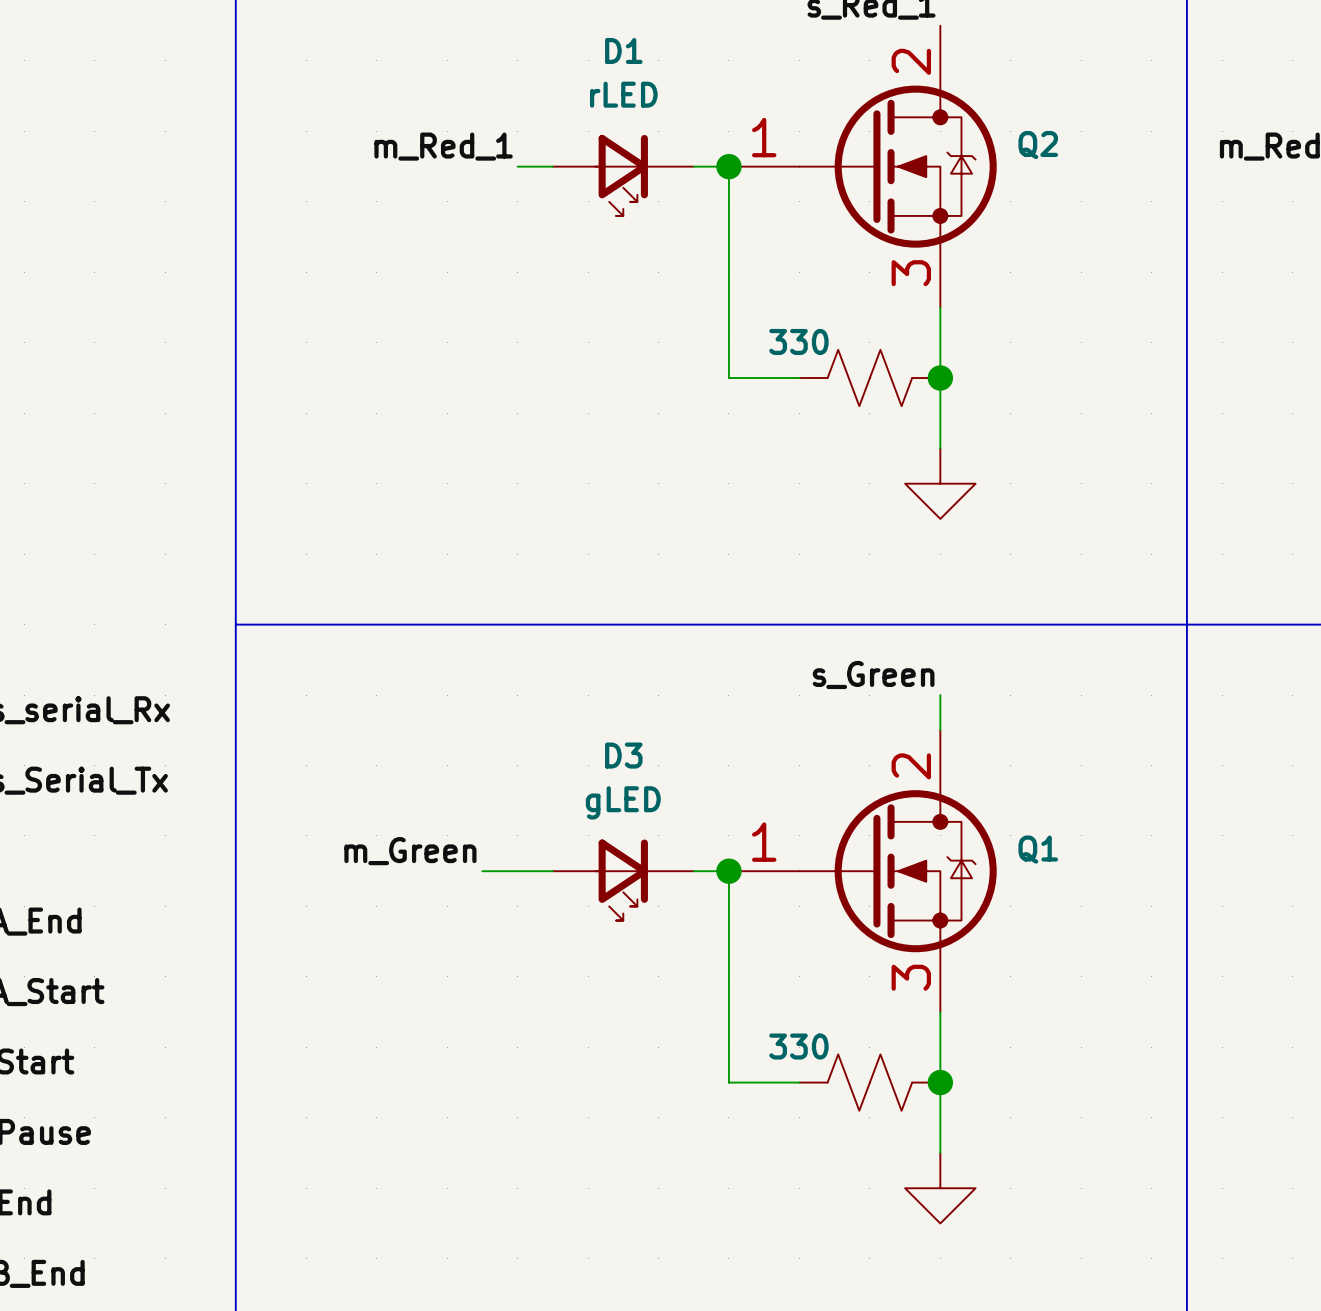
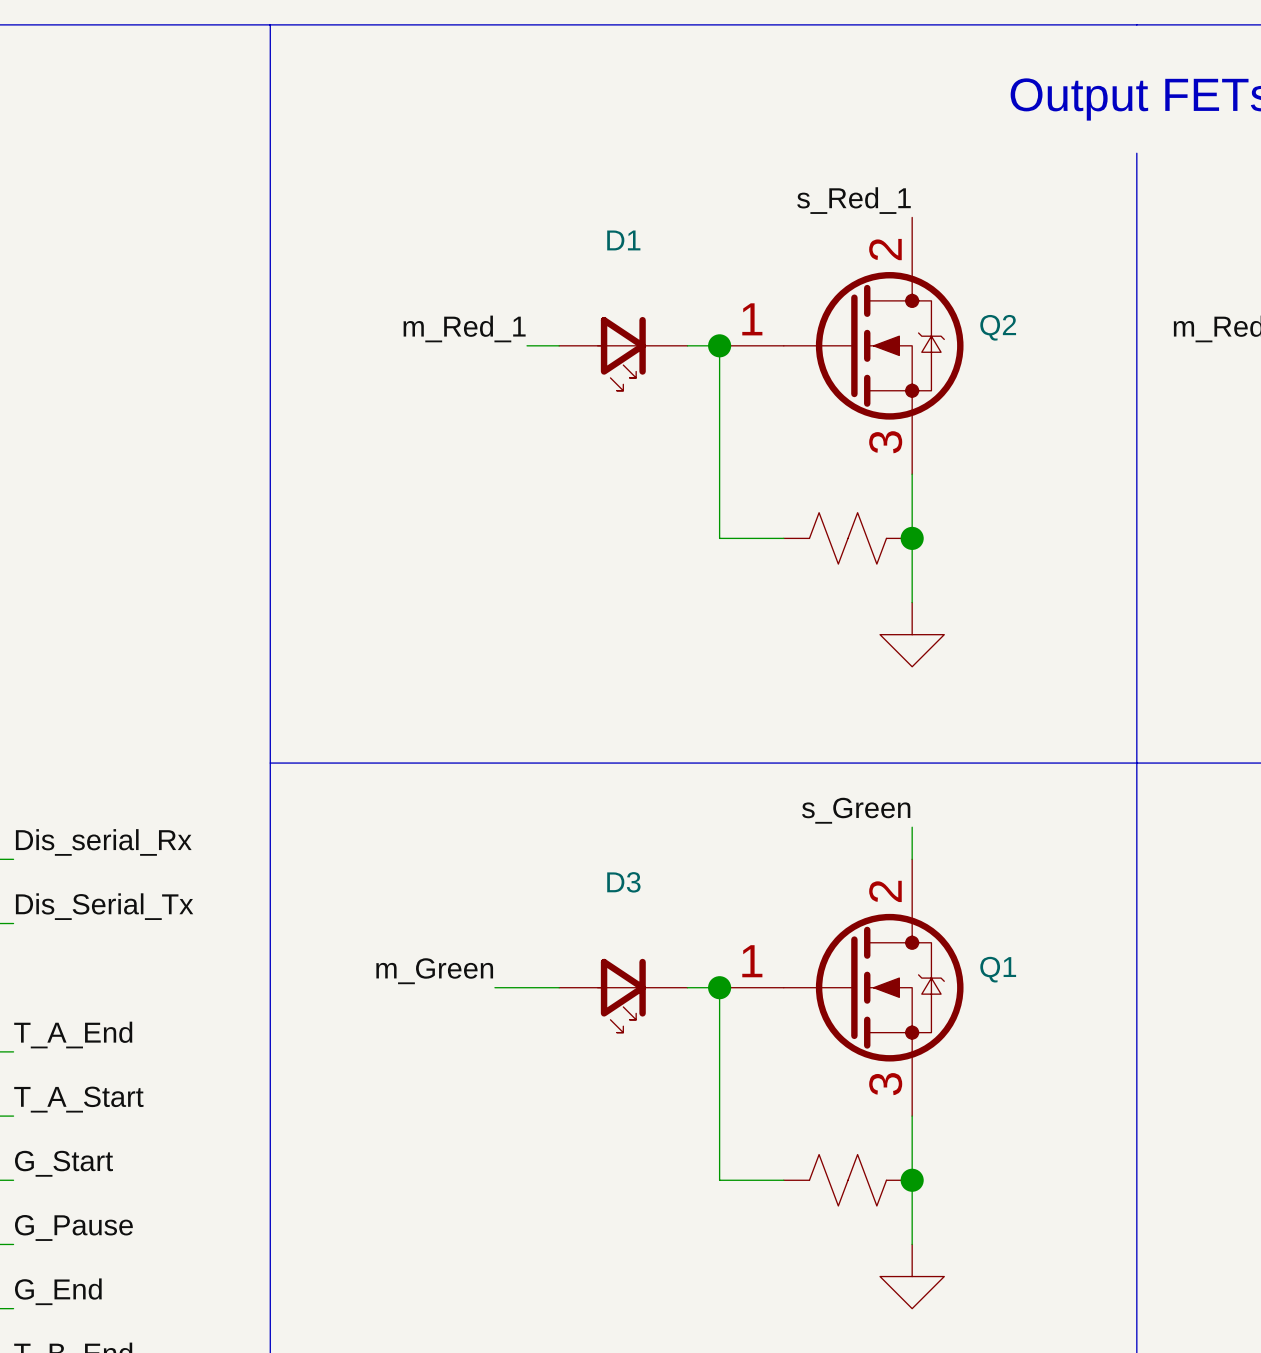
D1 value: rLED (623, 94) -> none
part value: 330 (798, 341) -> none
D3 value: gLED (623, 802) -> none
part value: 330 (798, 1046) -> none

